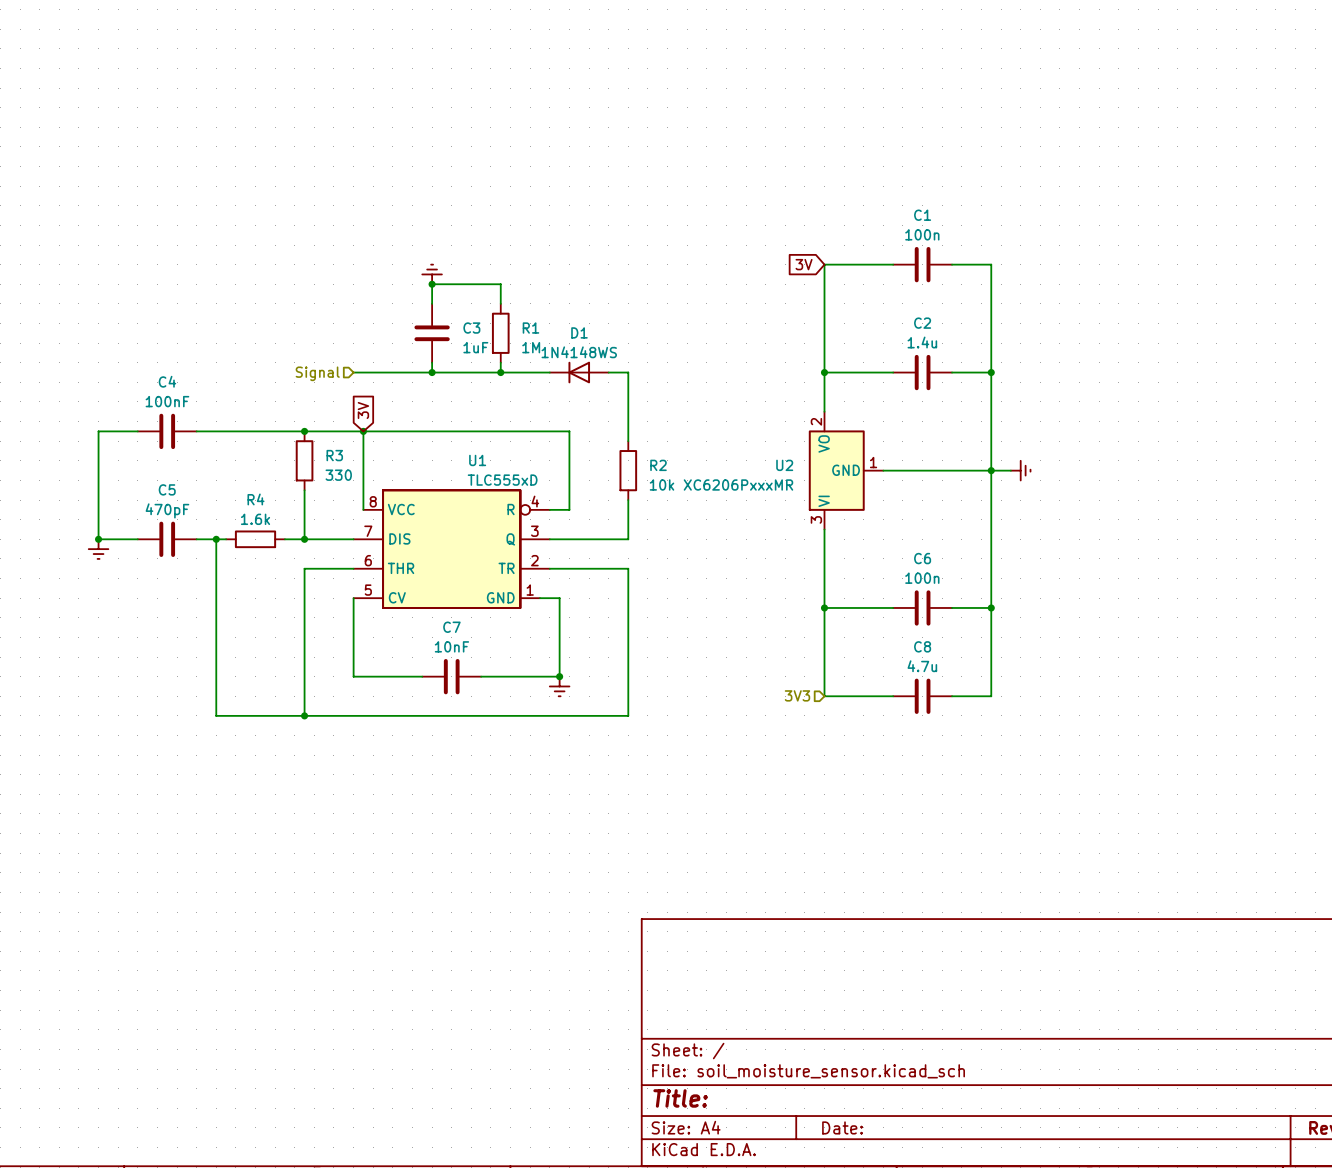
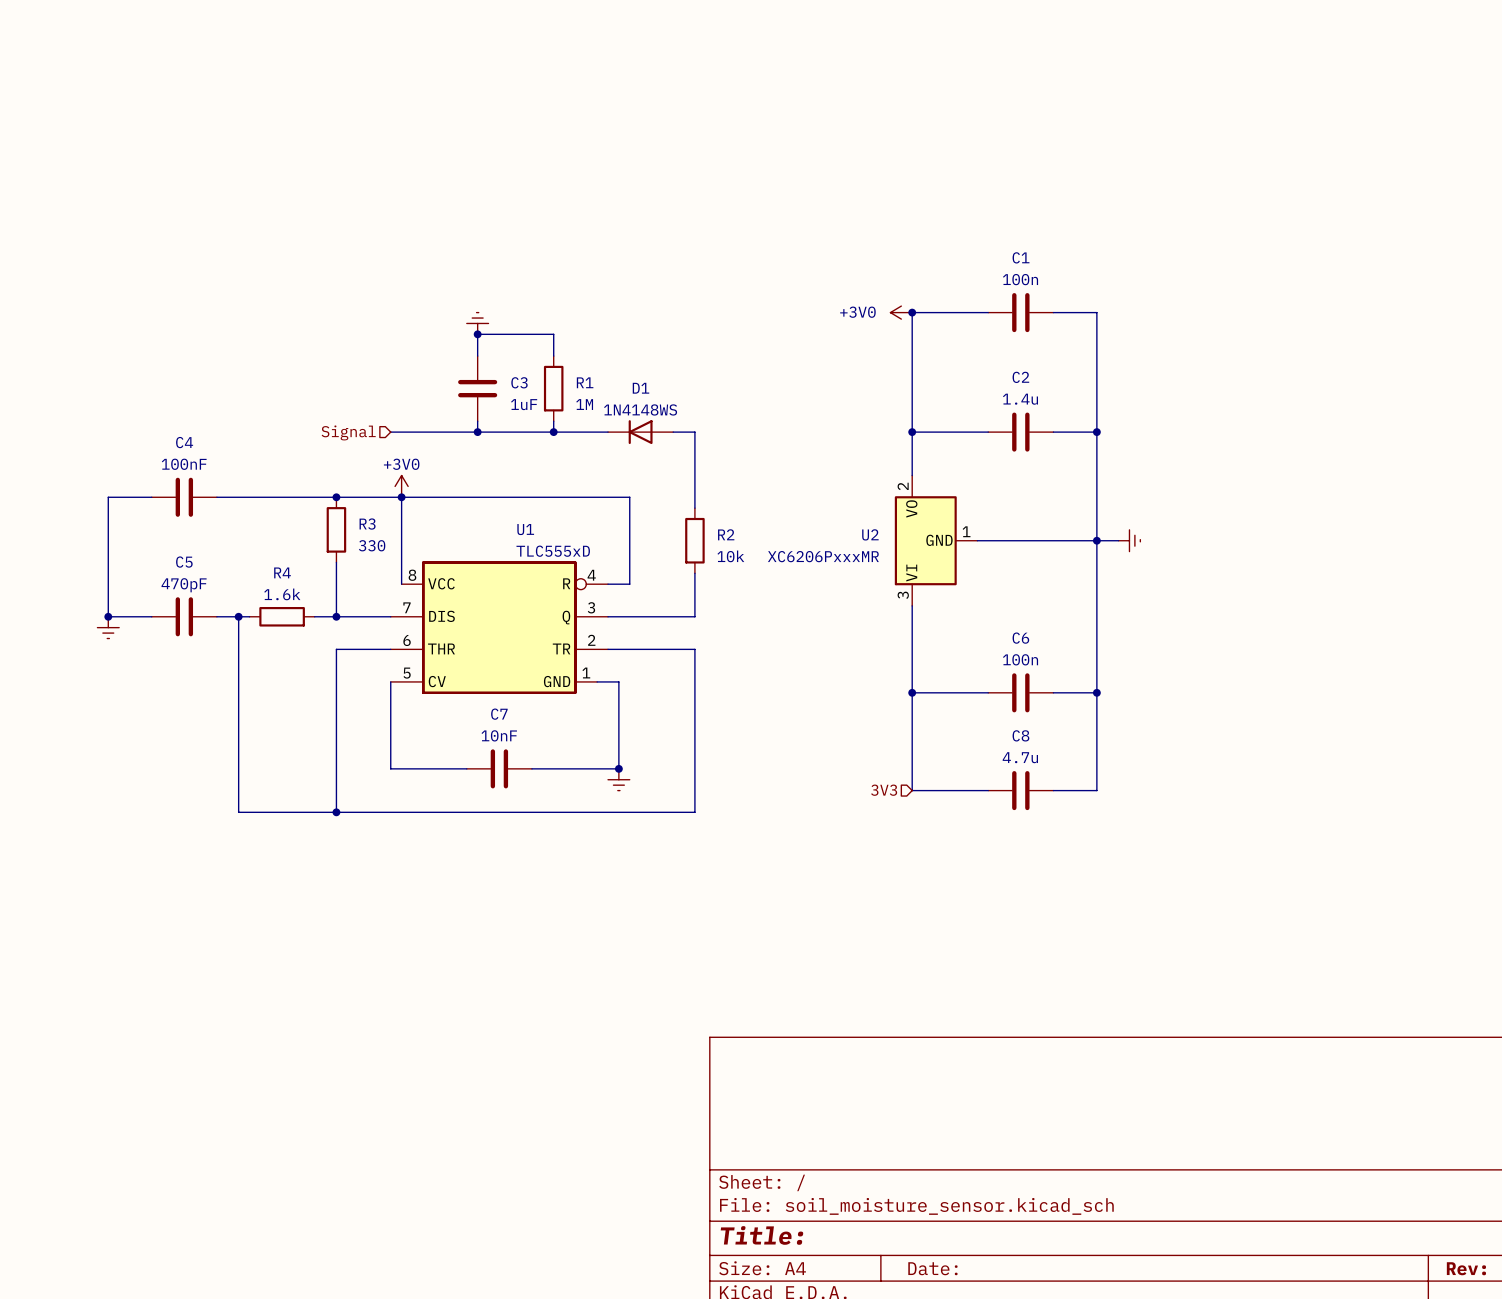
global label: 3V (804, 264) -> none
power symbol: none -> +3V0 (901, 312)
junction: none -> (912, 312)
global label: 3V (363, 410) -> none
power symbol: none -> +3V0 (401, 486)

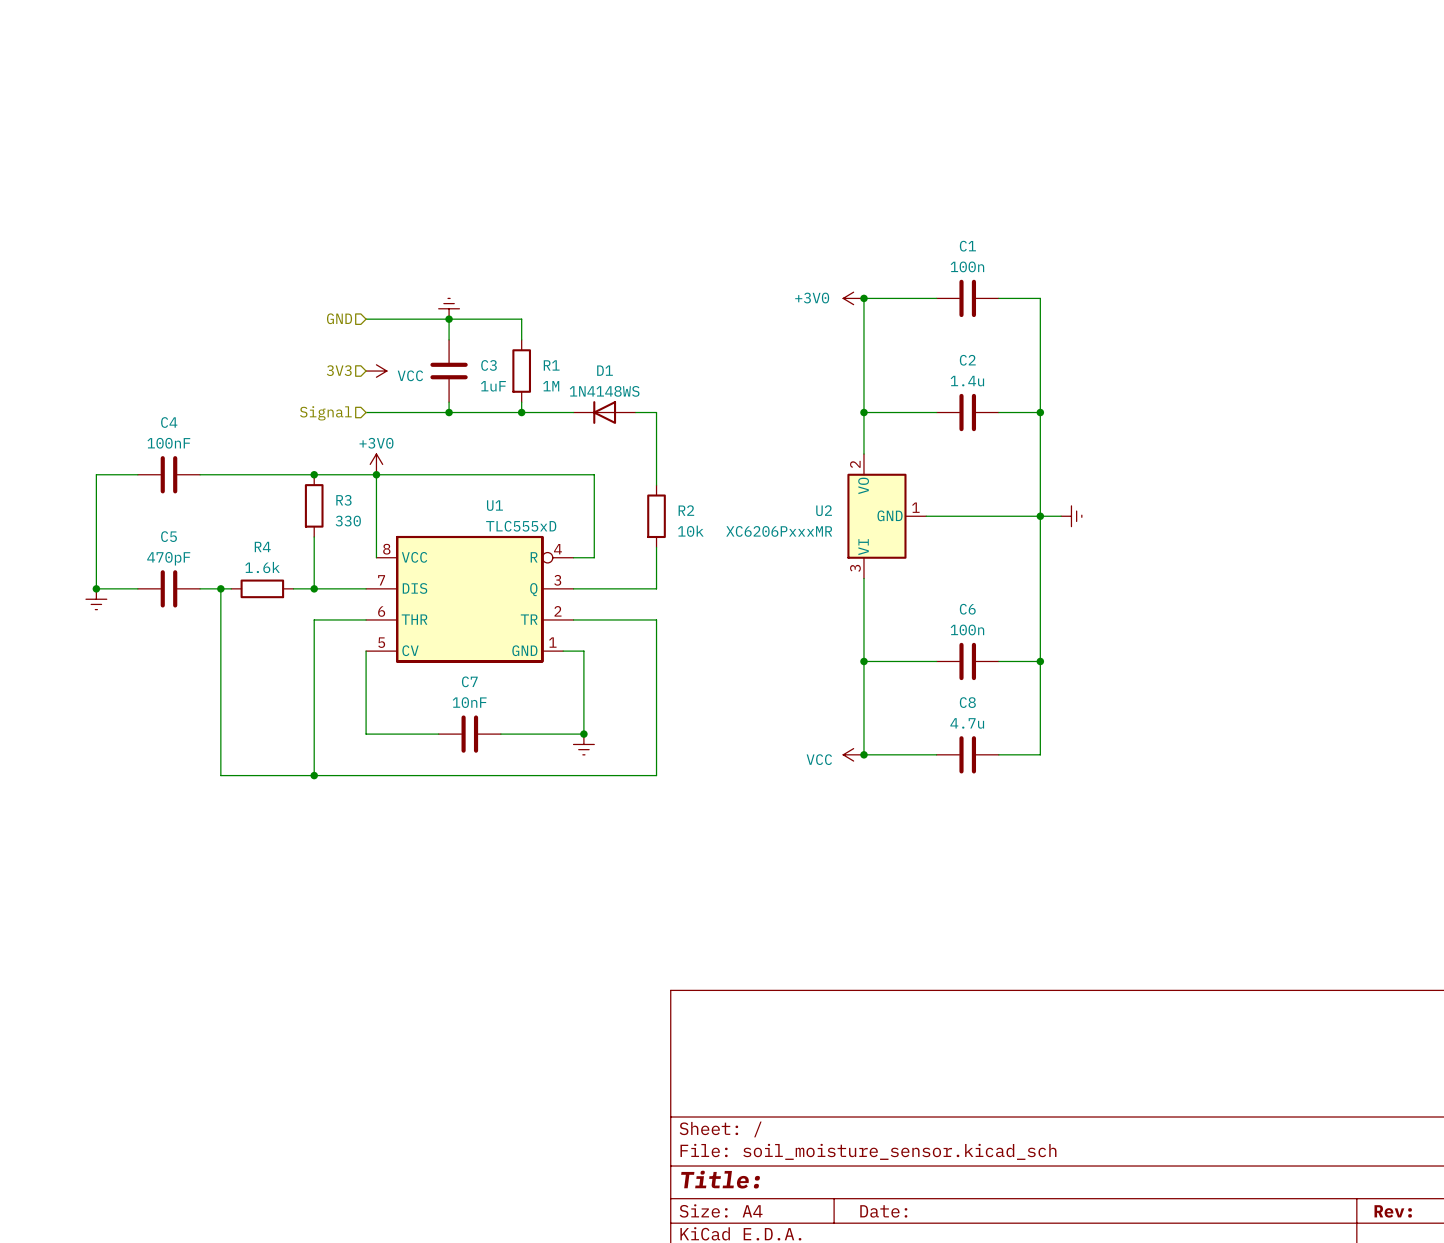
hierarchical label: none -> GND (339, 318)
wire: none -> (366, 319) (449, 319)
hierarchical label: none -> 3V3 (339, 370)
power symbol: none -> VCC (376, 371)
hierarchical label: 3V3 (884, 790) -> none
power symbol: none -> VCC (853, 754)
junction: none -> (863, 754)

